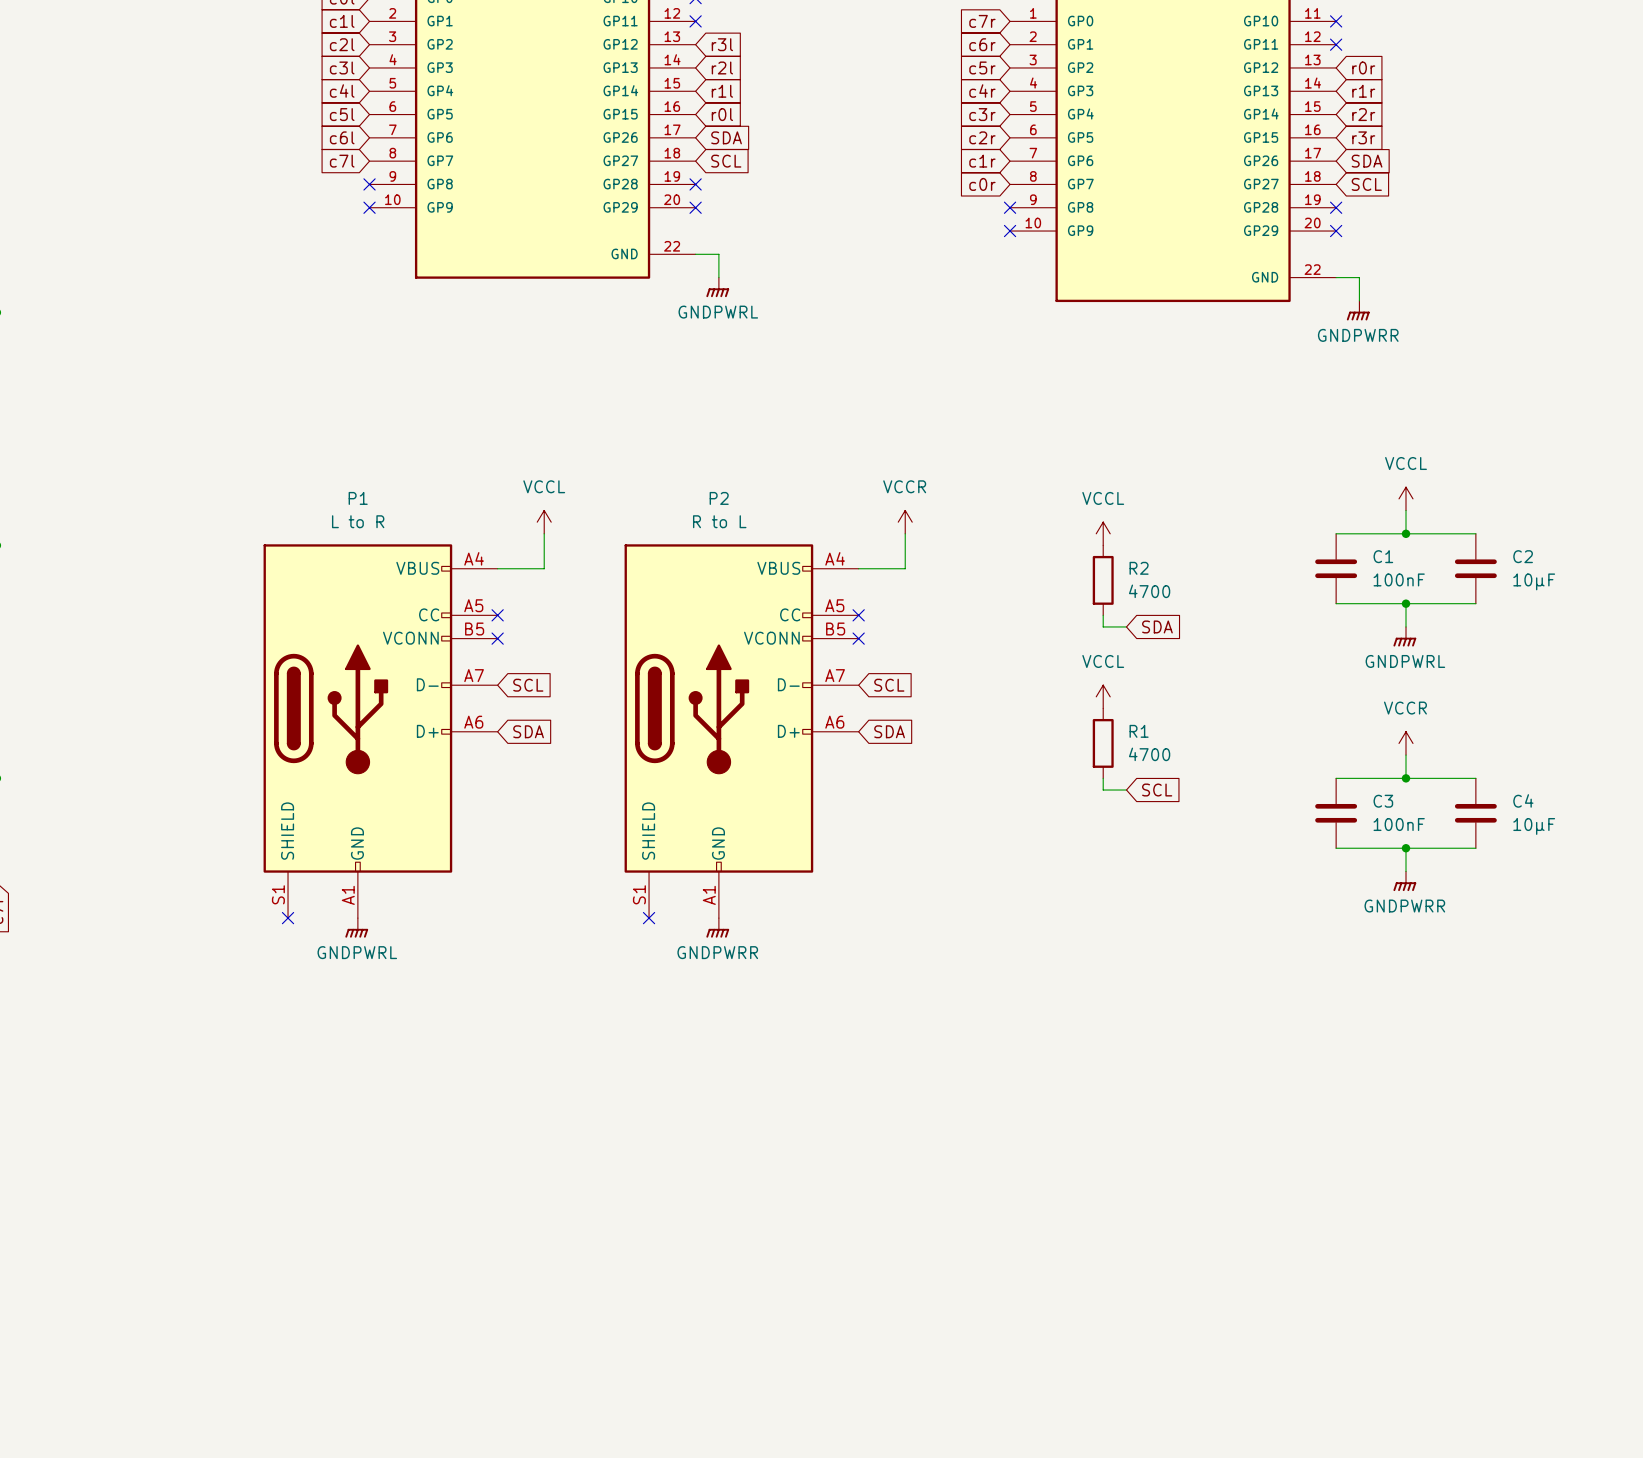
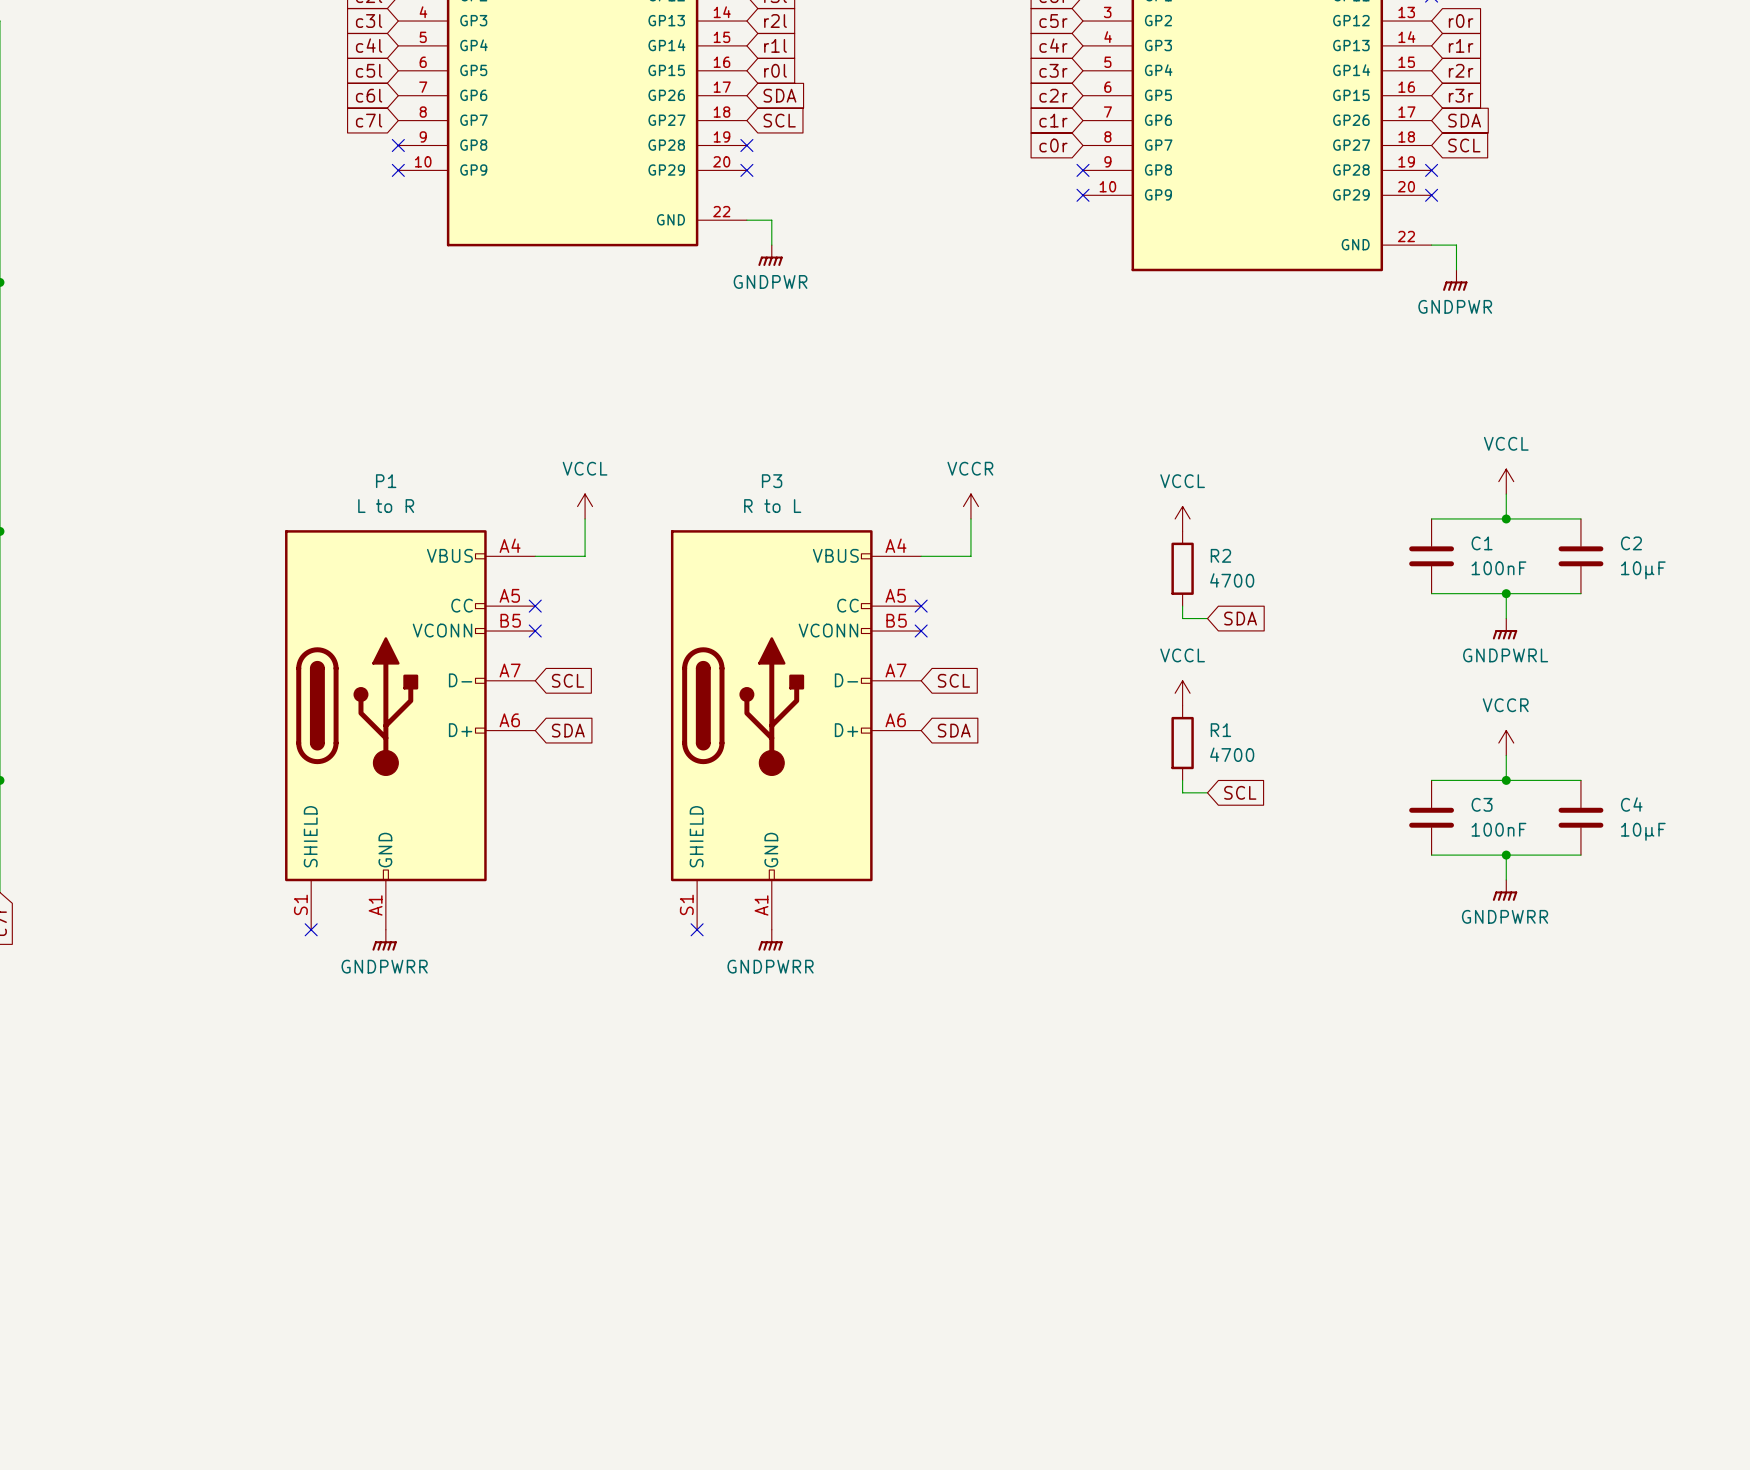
power symbol: GNDPWRL (717, 287) -> GNDPWR (770, 255)
power symbol: GNDPWRR (1358, 310) -> GNDPWR (1455, 280)
P2 name: P2 (719, 498) -> P3 (772, 481)
power symbol: GNDPWRL (356, 927) -> GNDPWRR (384, 940)

